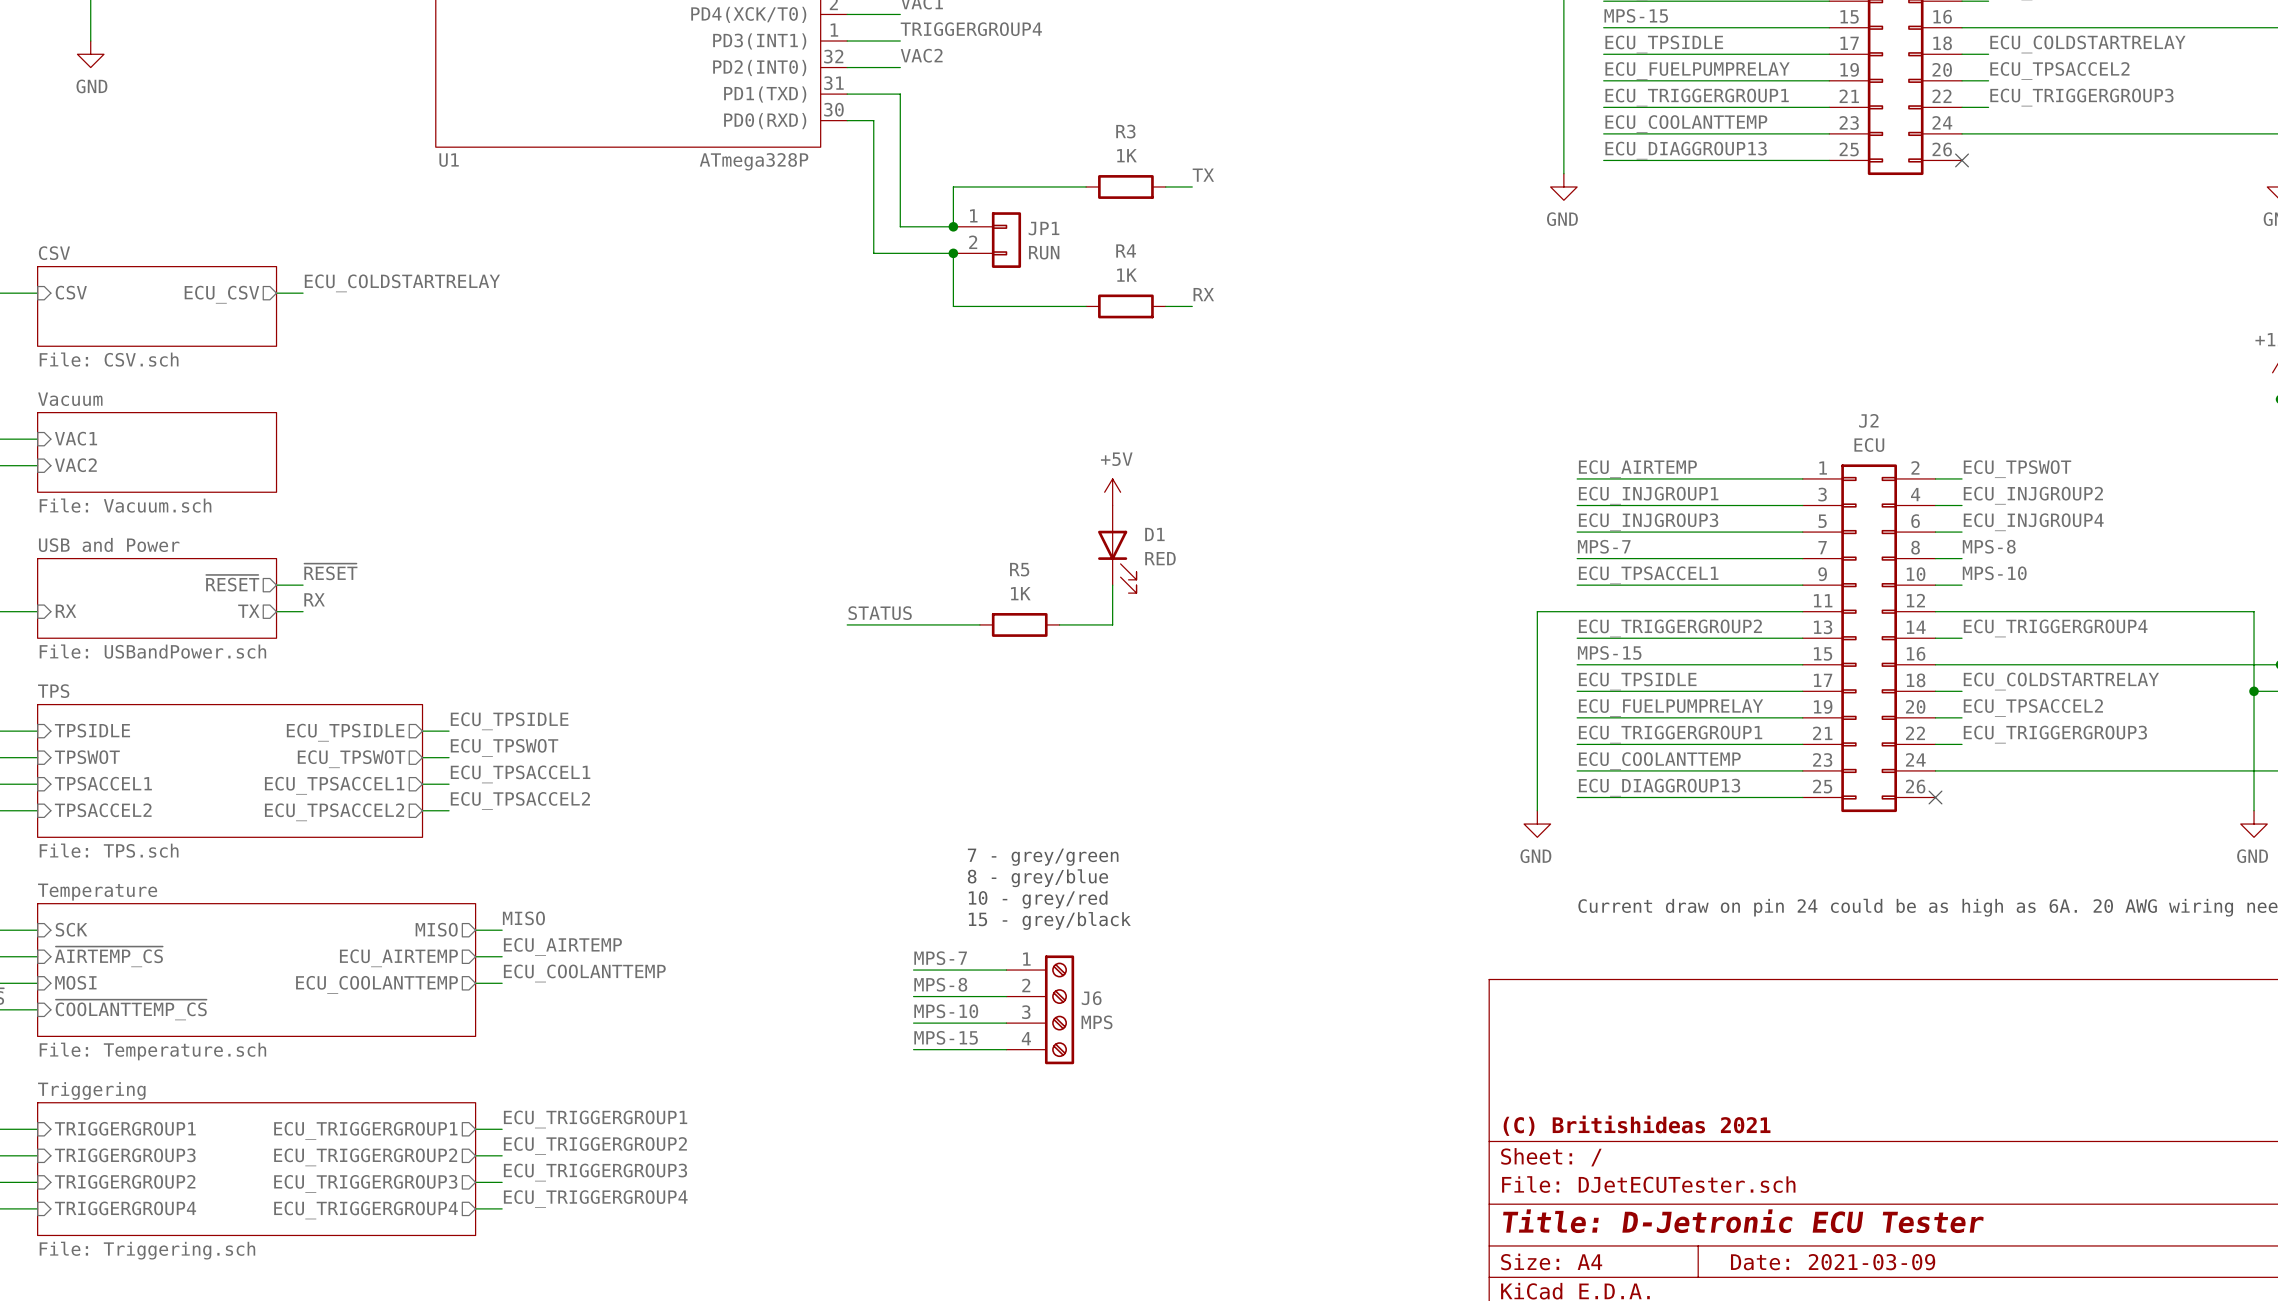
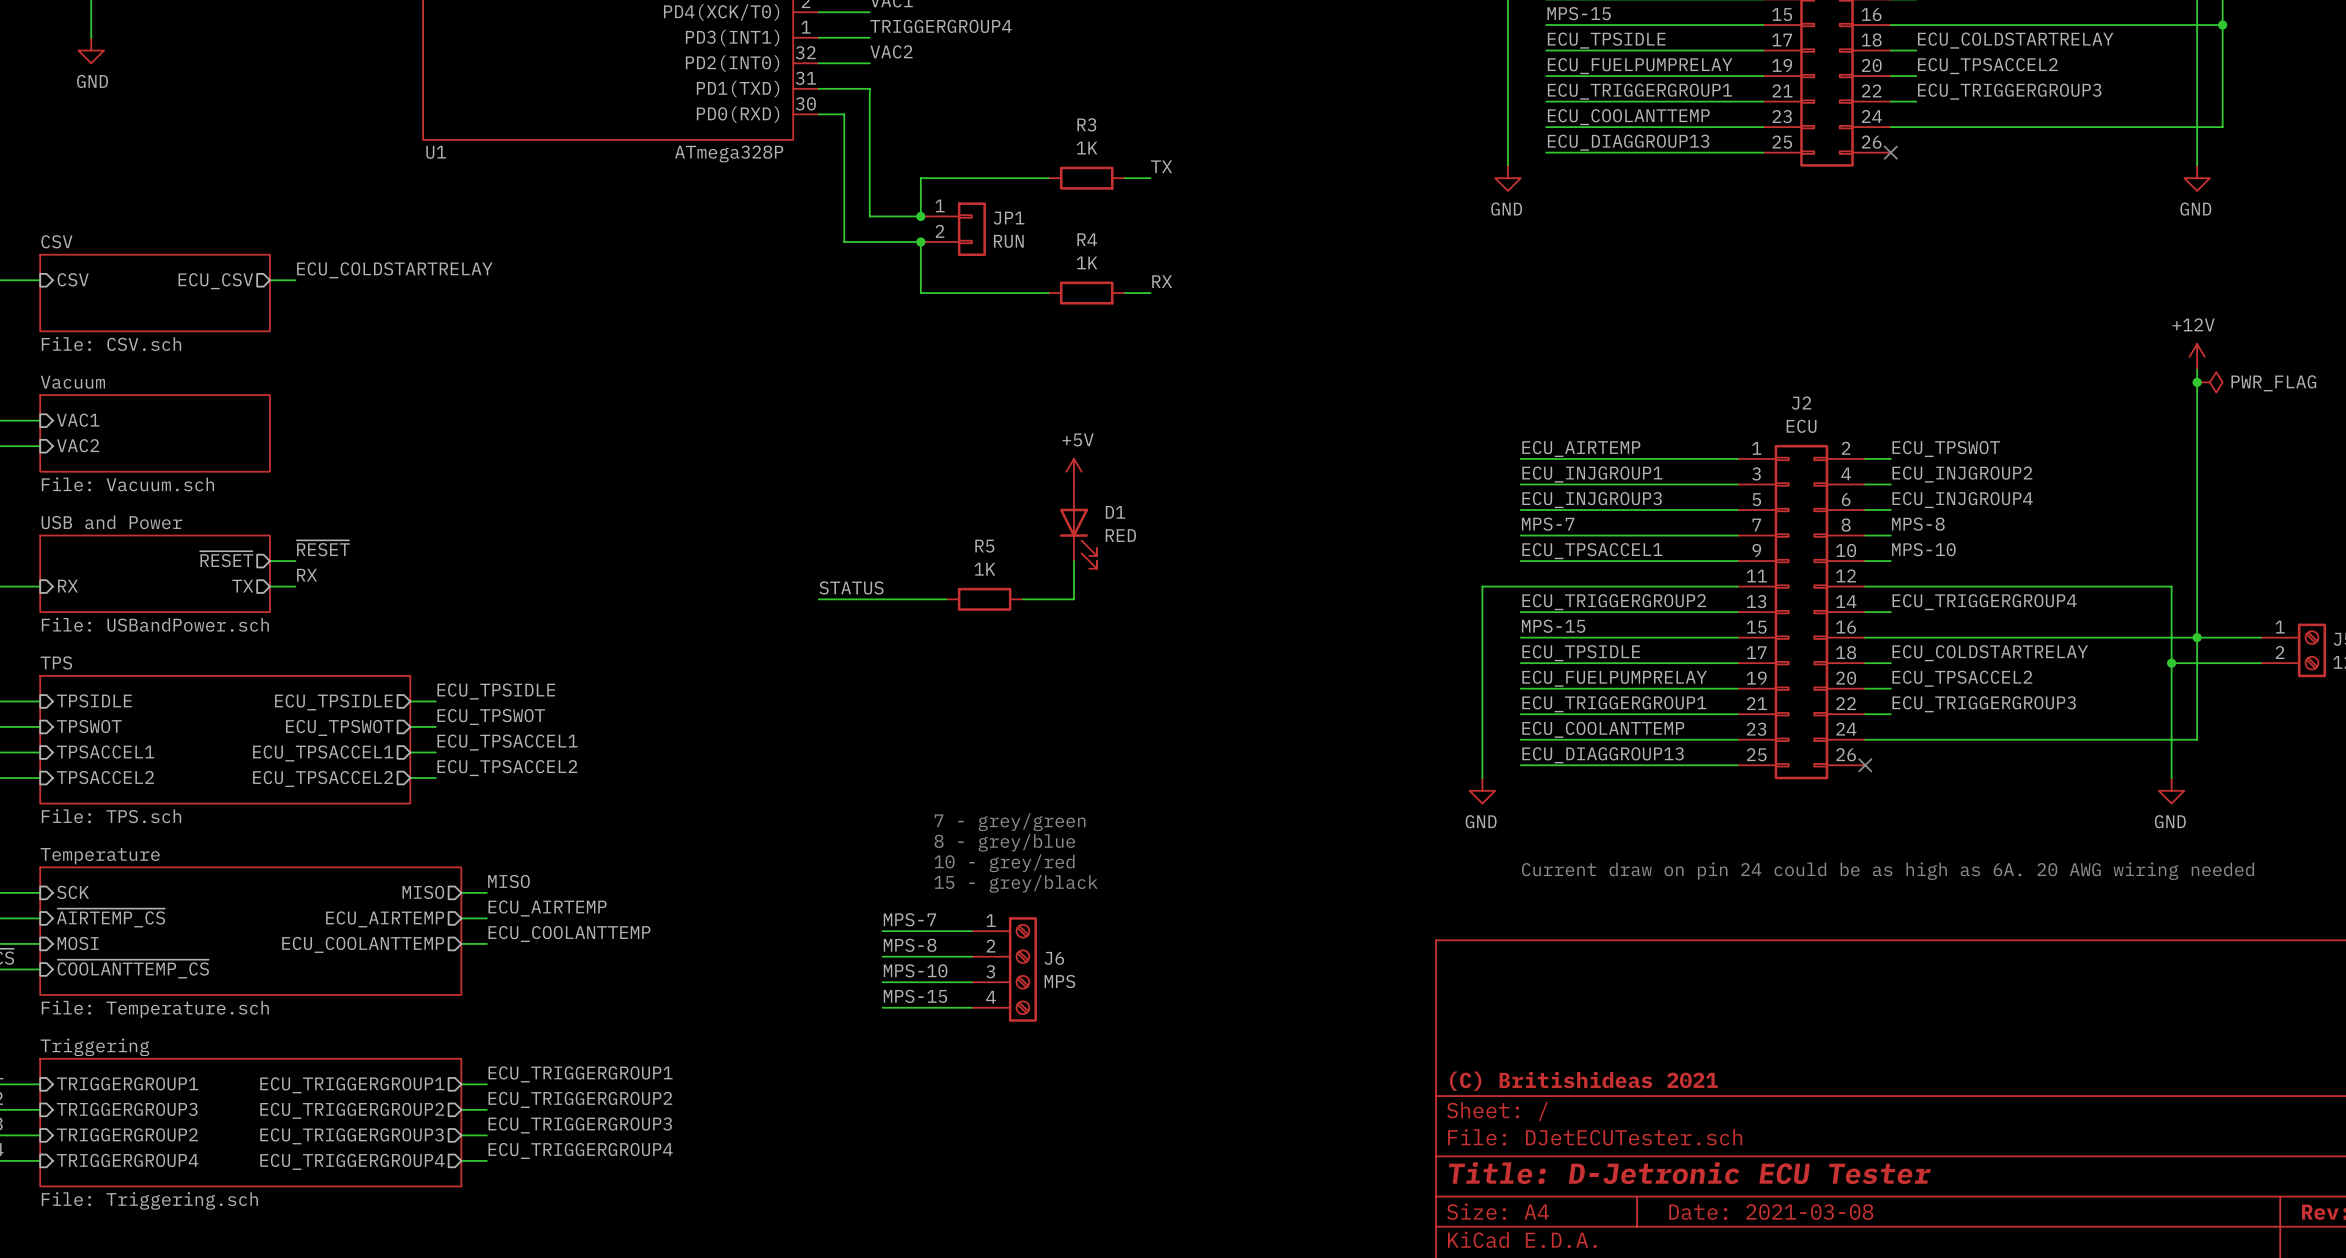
title block: Date: 2021-03-09 (1833, 1262) -> Date: 2021-03-08 (1771, 1212)

